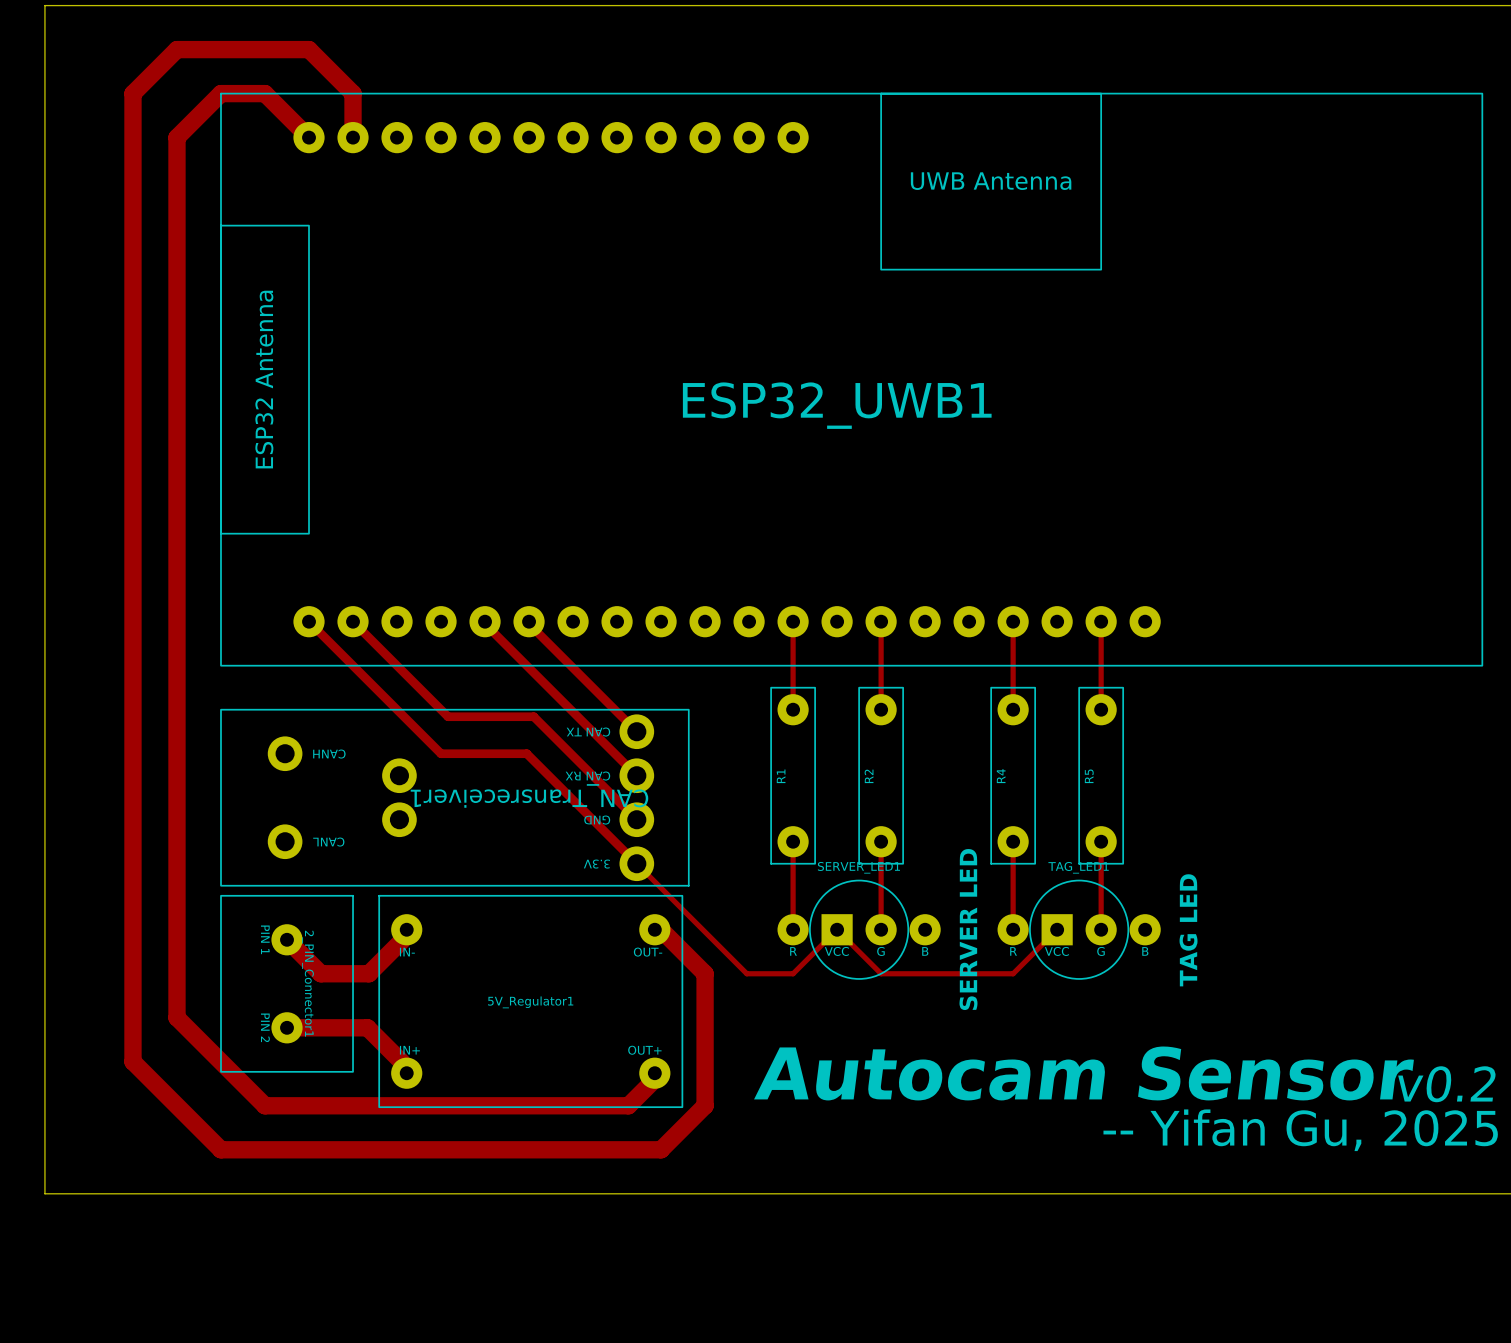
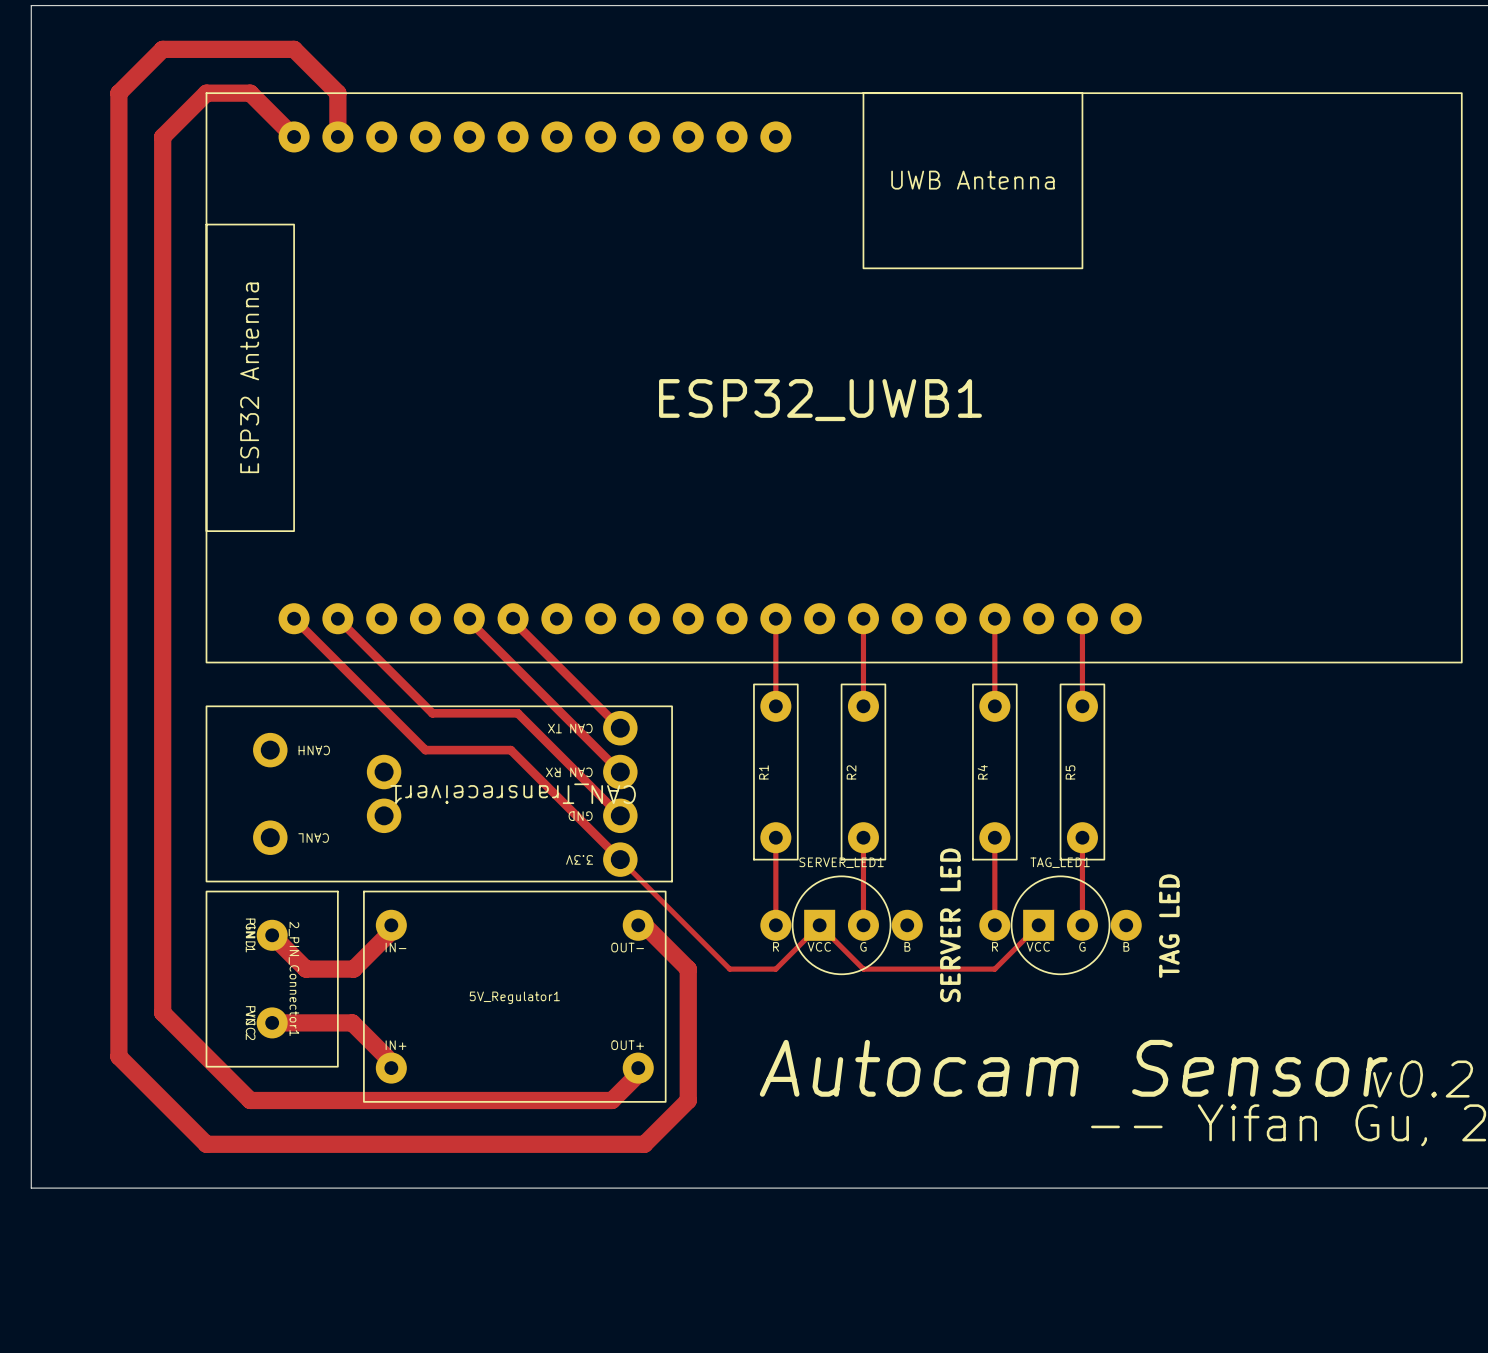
2_PIN_Connector1 footprint: [220, 894, 354, 1073] -> [205, 890, 339, 1068]

